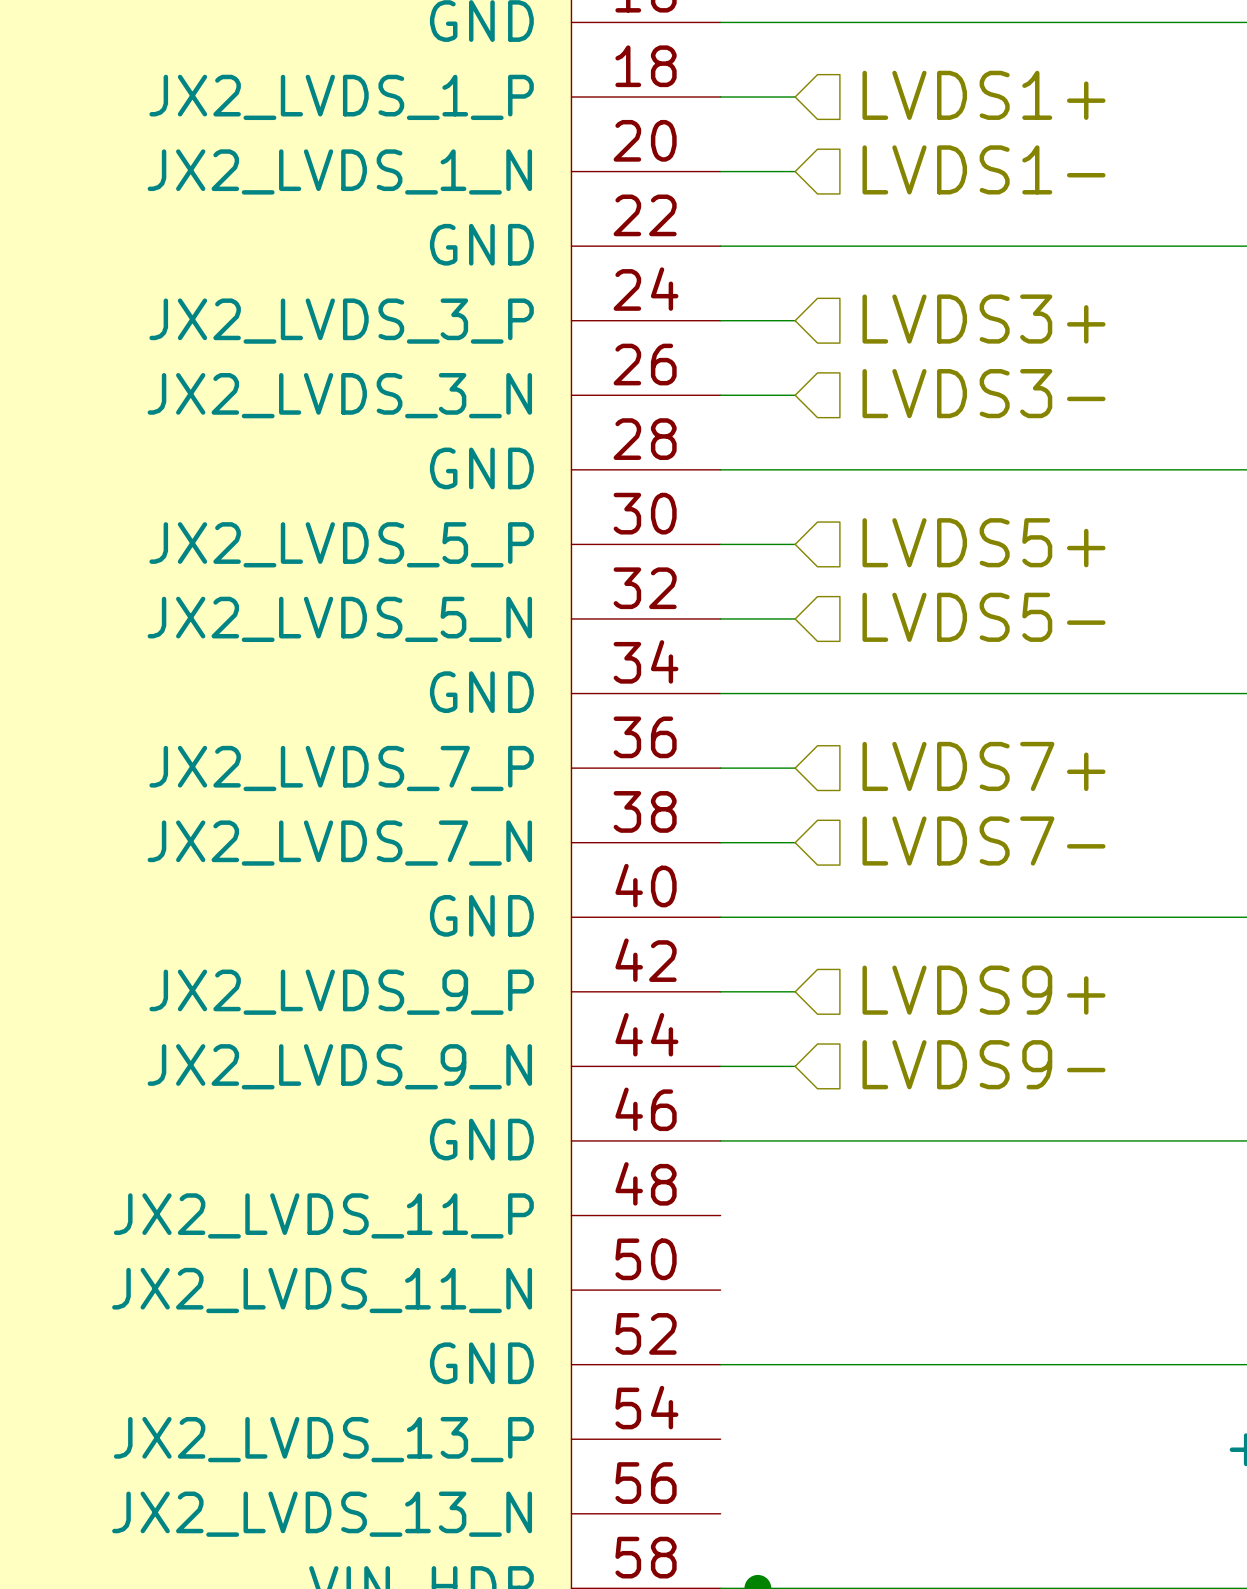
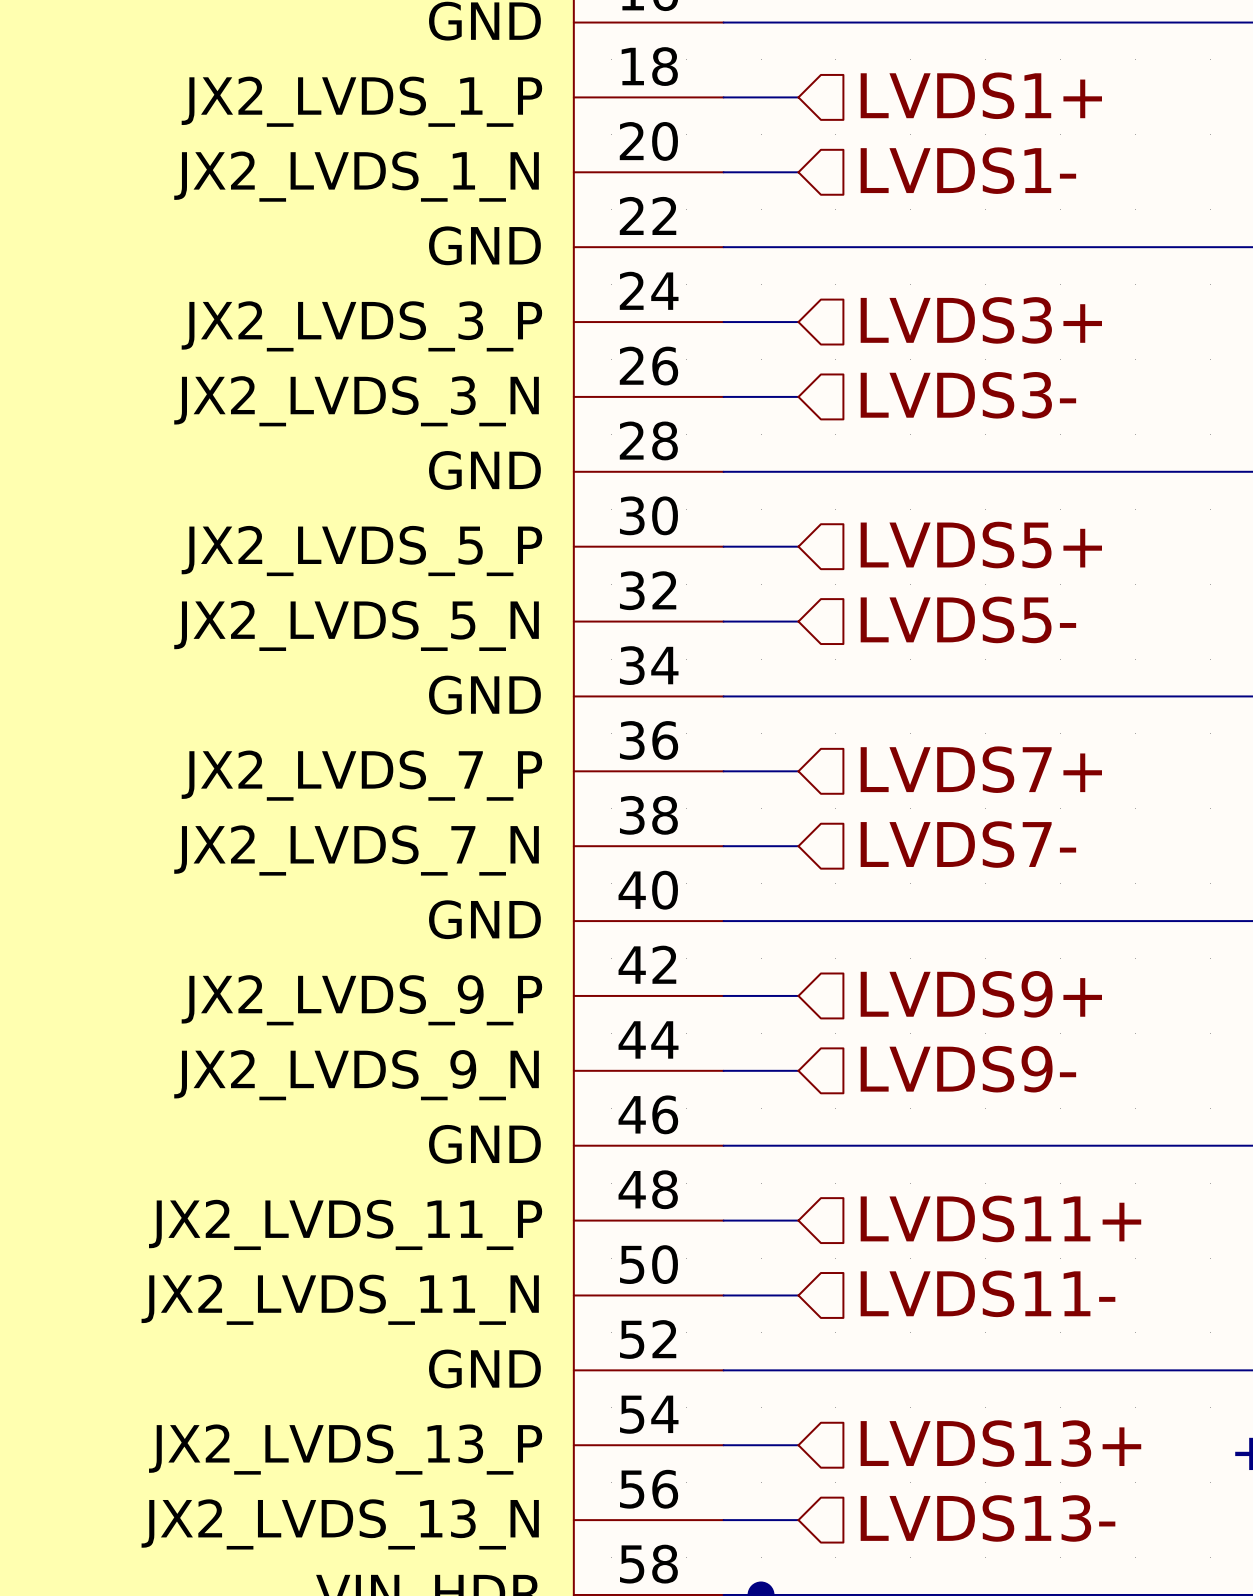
hierarchical label: none -> LVDS11+ (1000, 1218)
wire: none -> (723, 1220) (798, 1220)
hierarchical label: none -> LVDS11- (988, 1293)
wire: none -> (723, 1295) (798, 1295)
hierarchical label: none -> LVDS13+ (1000, 1443)
wire: none -> (723, 1445) (798, 1445)
hierarchical label: none -> LVDS13- (988, 1518)
wire: none -> (723, 1520) (798, 1520)

